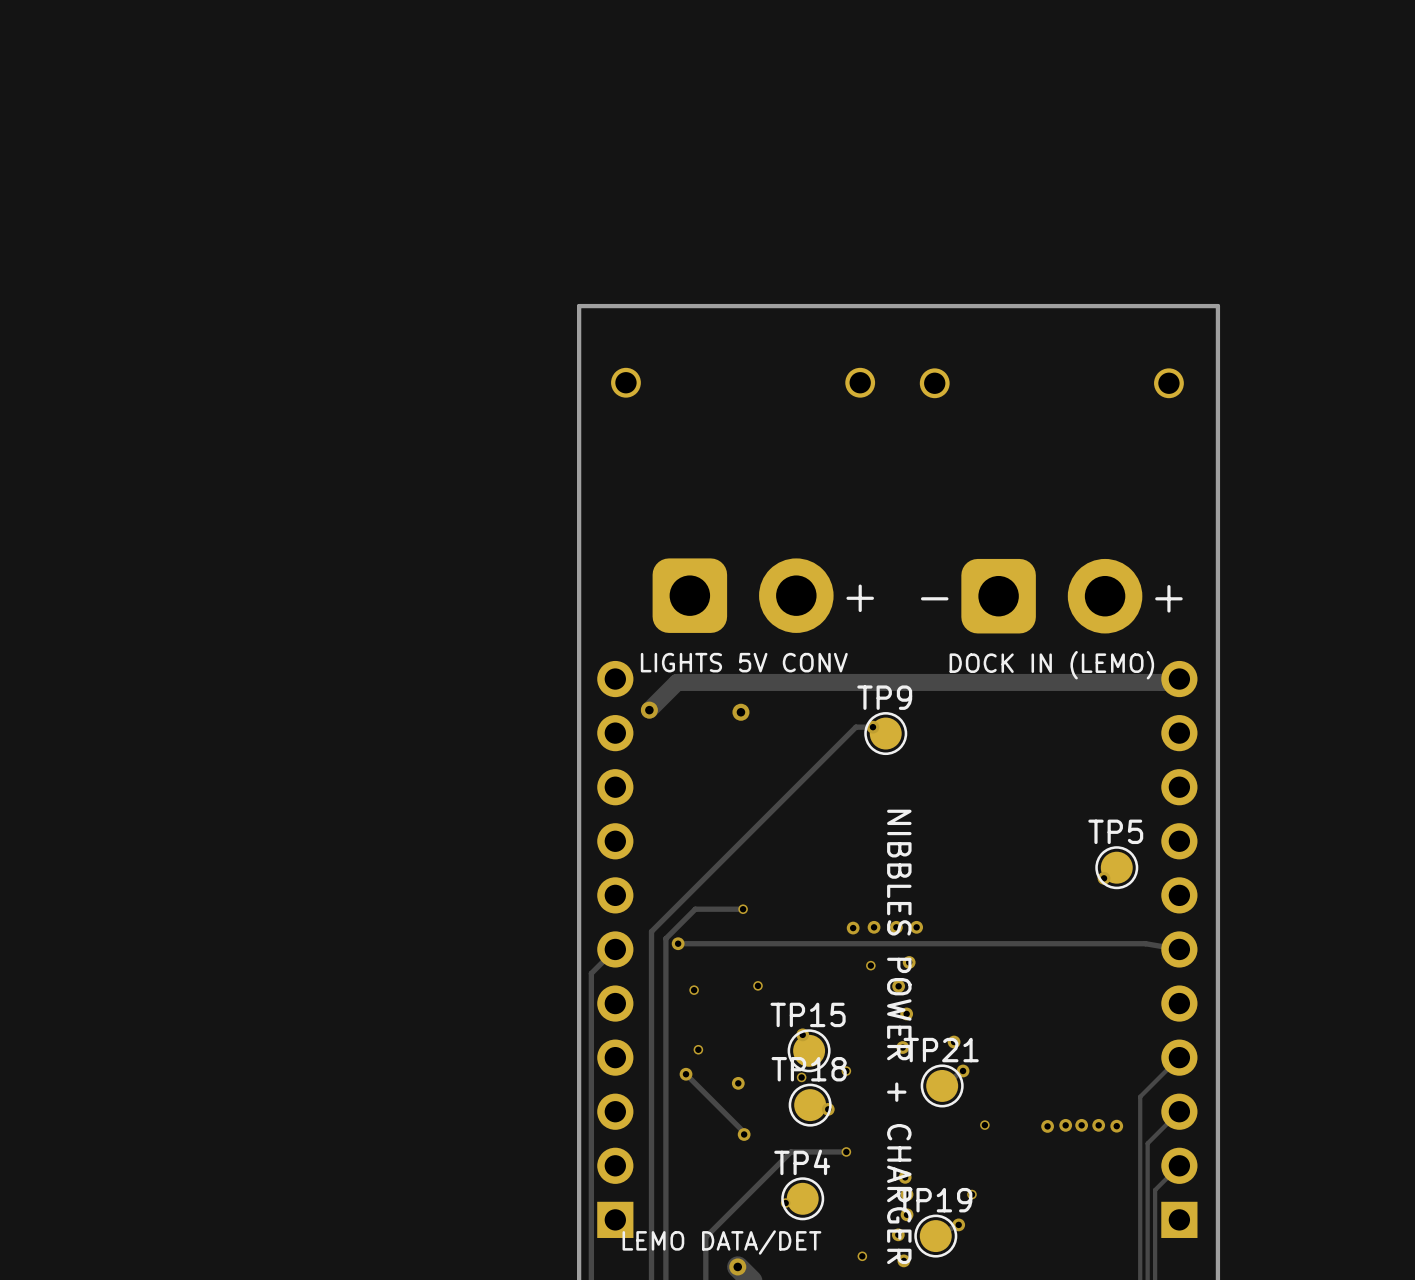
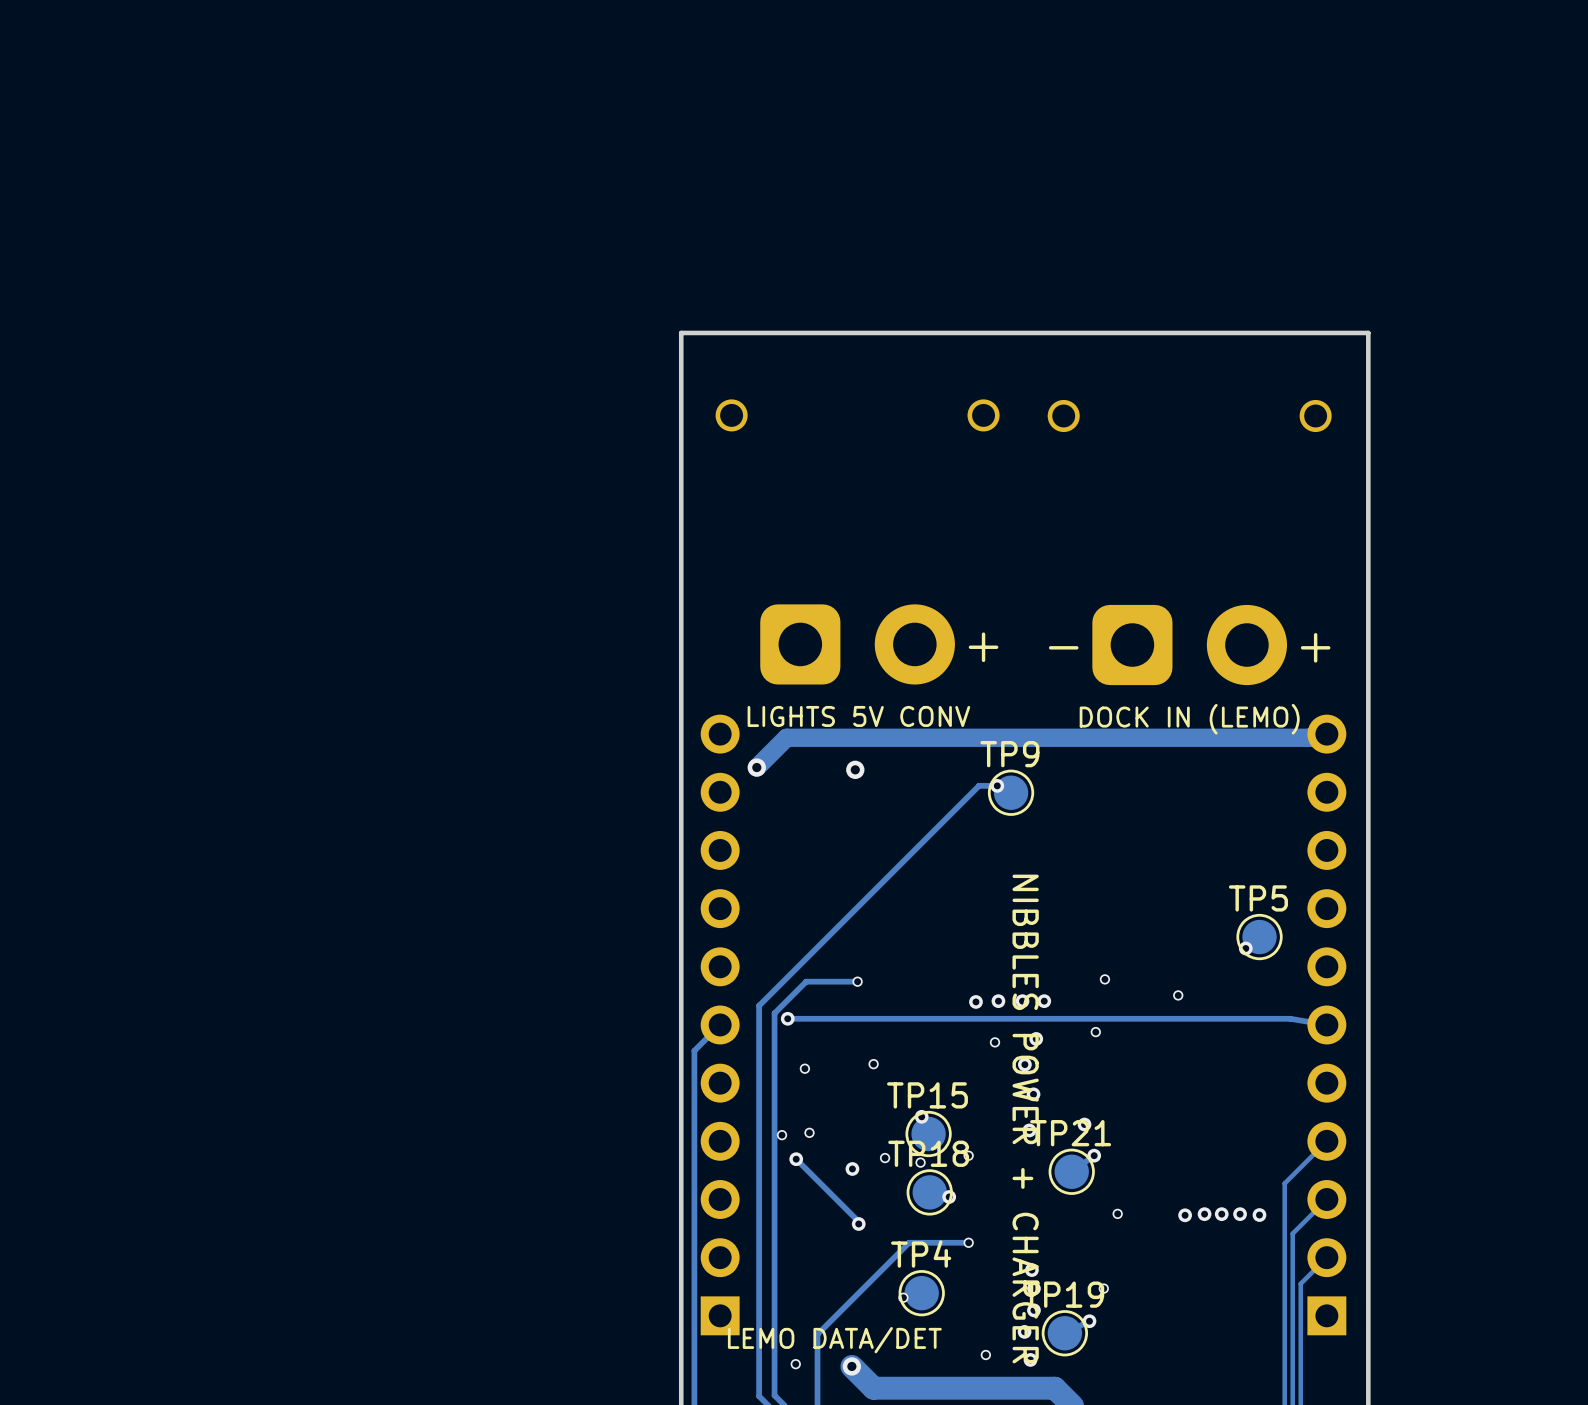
via: none -> (1104, 979)
via: none -> (1178, 995)
via: none -> (1095, 1032)
via: none -> (782, 1135)
via: none -> (885, 1158)
via: none -> (795, 1364)

